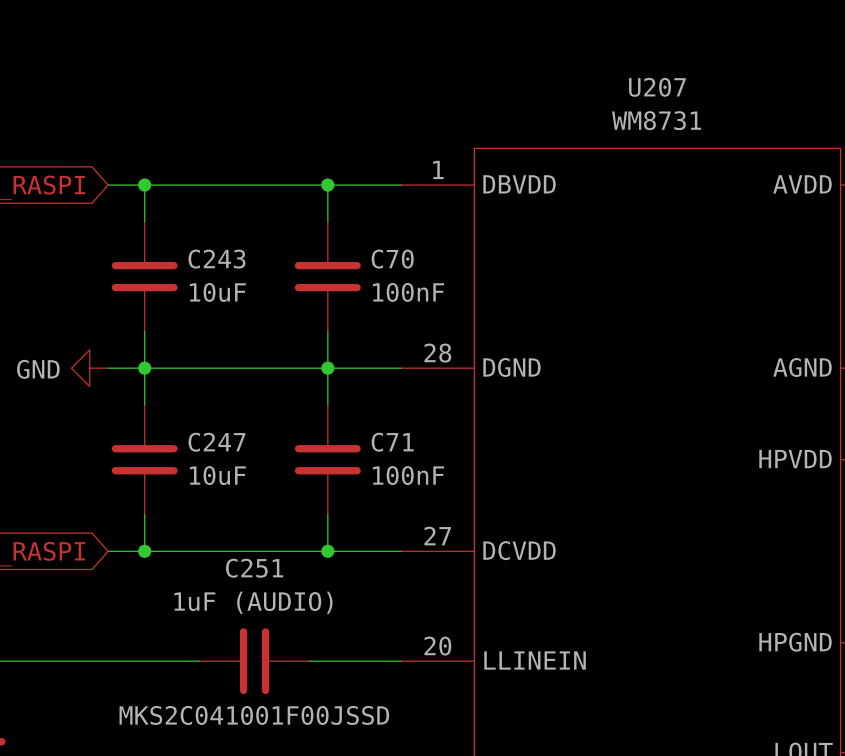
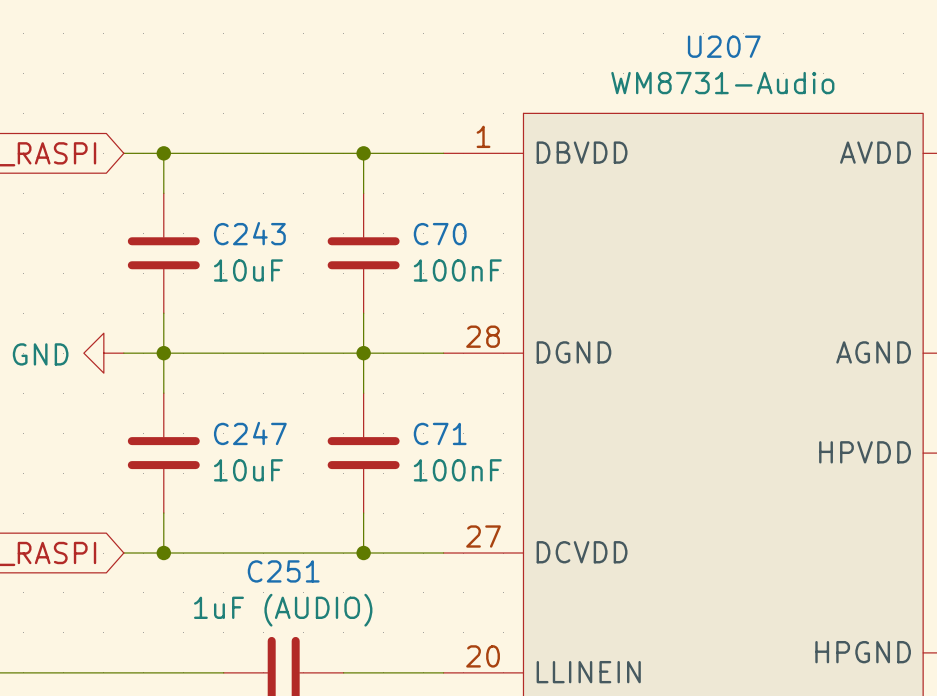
U207 value: WM8731 (656, 120) -> WM8731-Audio (722, 83)

